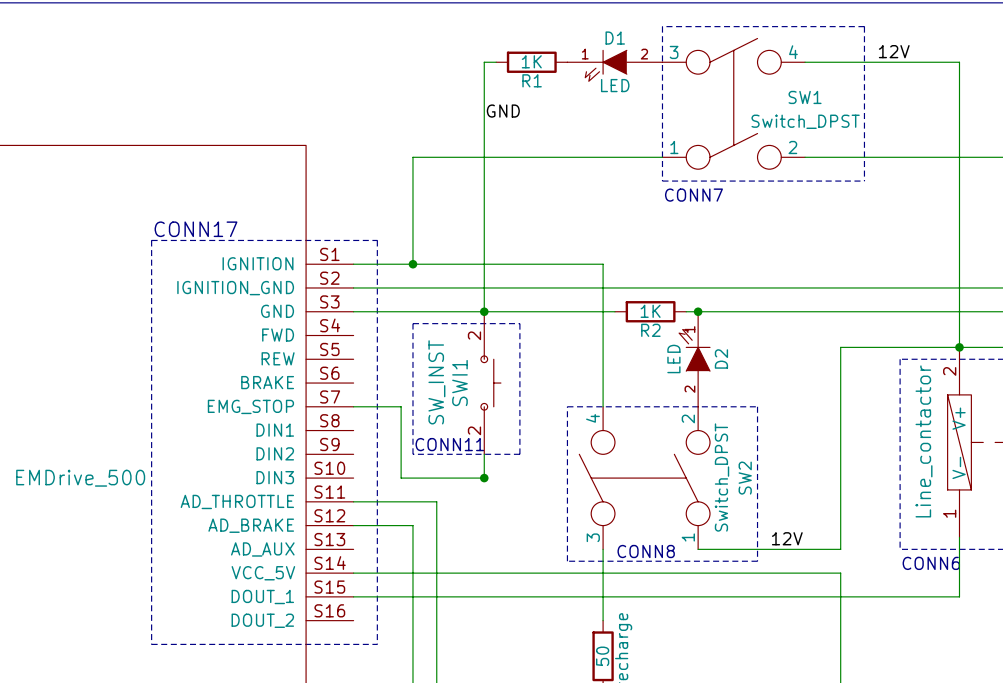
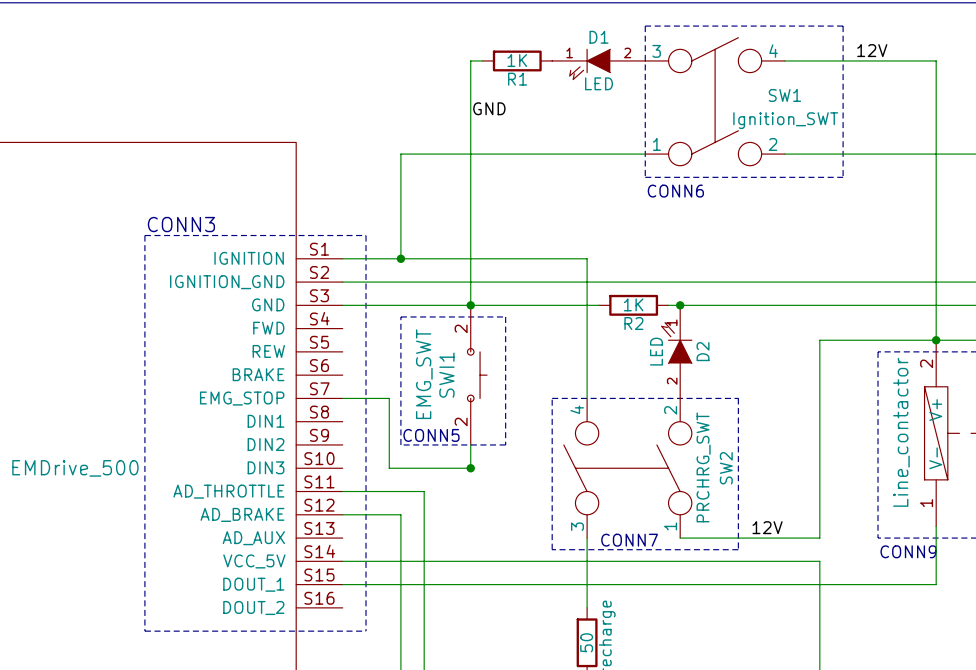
SW1 value: Switch_DPST (805, 121) -> Ignition_SWT (785, 120)
text: CONN7 (693, 195) -> CONN6 (675, 191)
text: CONN17 (196, 229) -> CONN3 (181, 224)
SWI1 value: SW_INST (436, 382) -> EMG_SWT (424, 374)
text: CONN11 (449, 444) -> CONN5 (431, 435)
SW2 value: Switch_DPST (722, 477) -> PRCHRG_SWT (703, 467)
text: CONN8 (646, 551) -> CONN7 (629, 540)
text: CONN6 (931, 563) -> CONN9 (908, 551)

